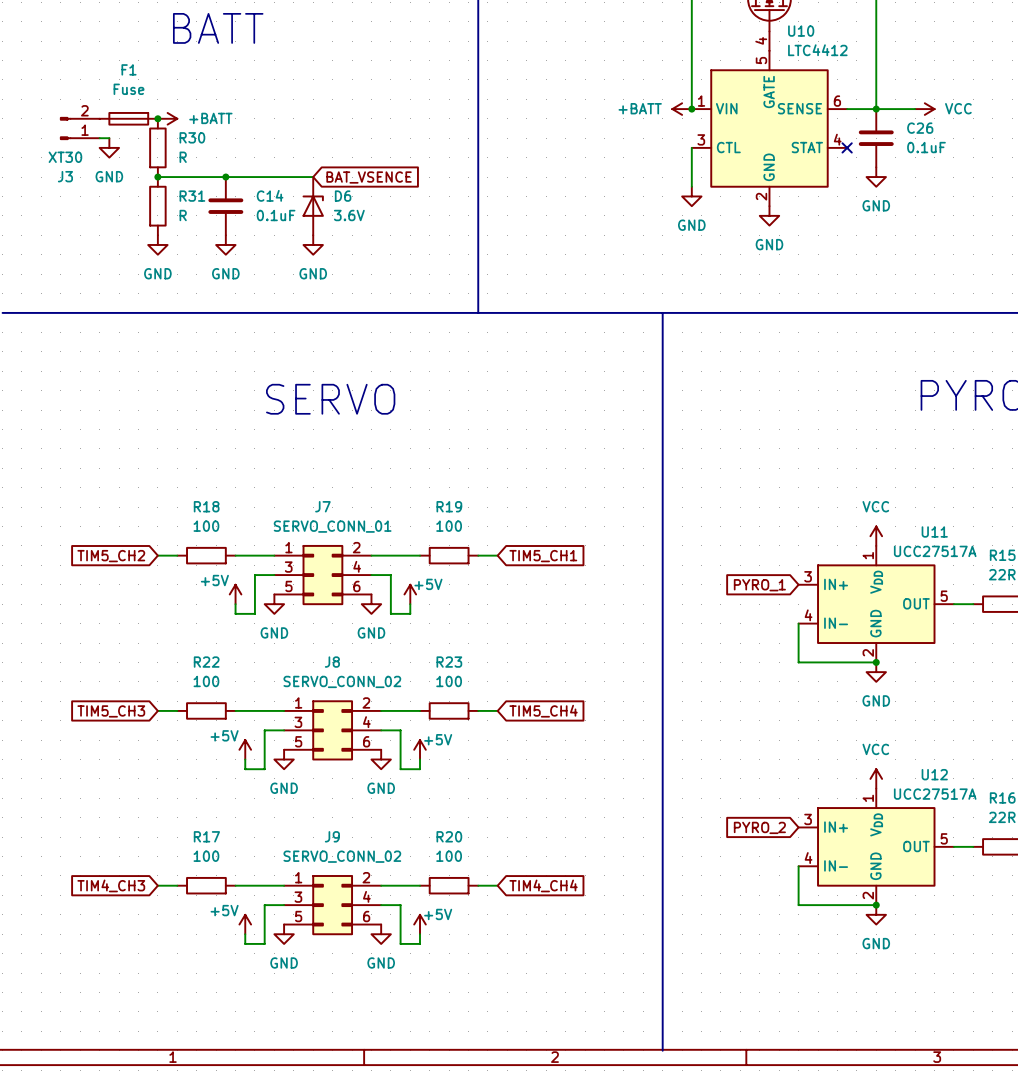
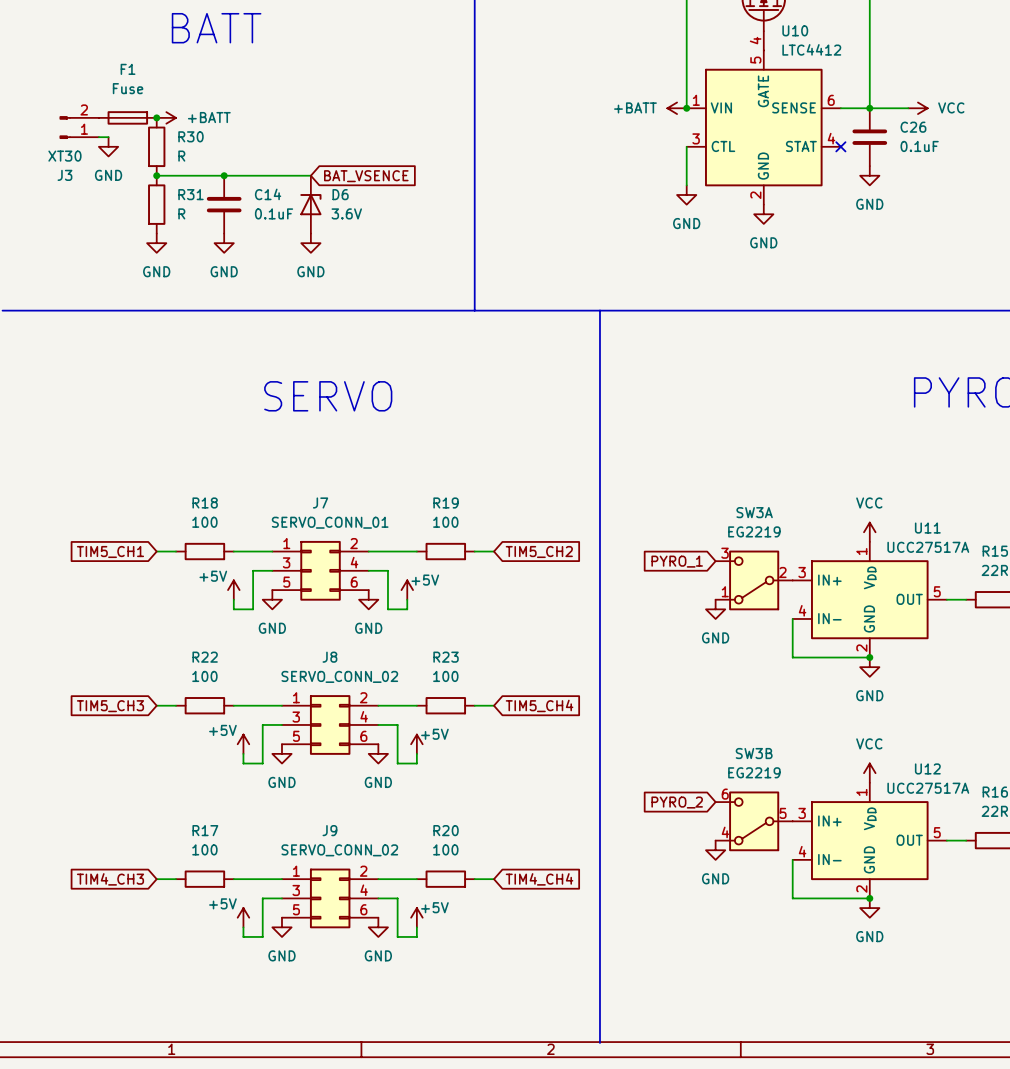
line: (662, 312) (662, 1050) -> (599, 310) (599, 1042)
global label: TIM5_CH2 (111, 556) -> TIM5_CH1 (110, 551)
global label: TIM5_CH1 (543, 556) -> TIM5_CH2 (539, 551)
SW3A: none -> EG2219 (754, 580)
global label position: PYRO_1 (759, 585) -> PYRO_1 (677, 561)
power symbol: none -> GND (715, 609)
global label position: PYRO_2 (759, 827) -> PYRO_2 (677, 802)
SW3B: none -> EG2219 (754, 821)
power symbol: none -> GND (715, 850)

